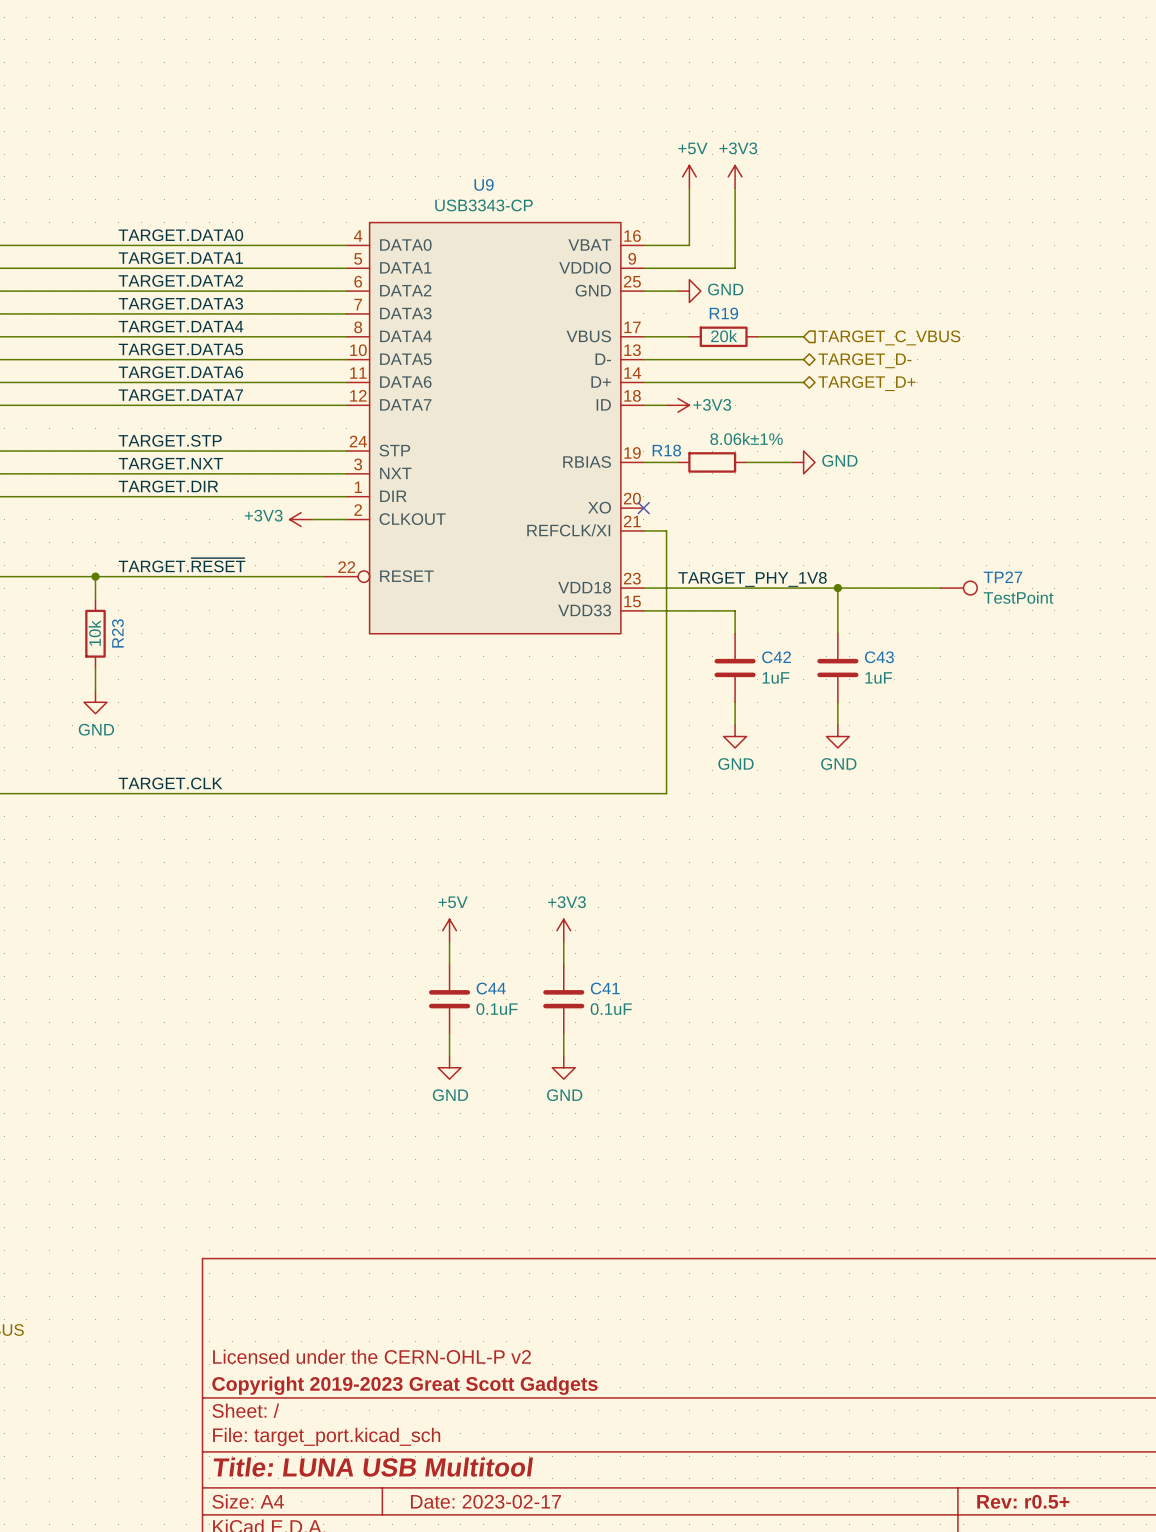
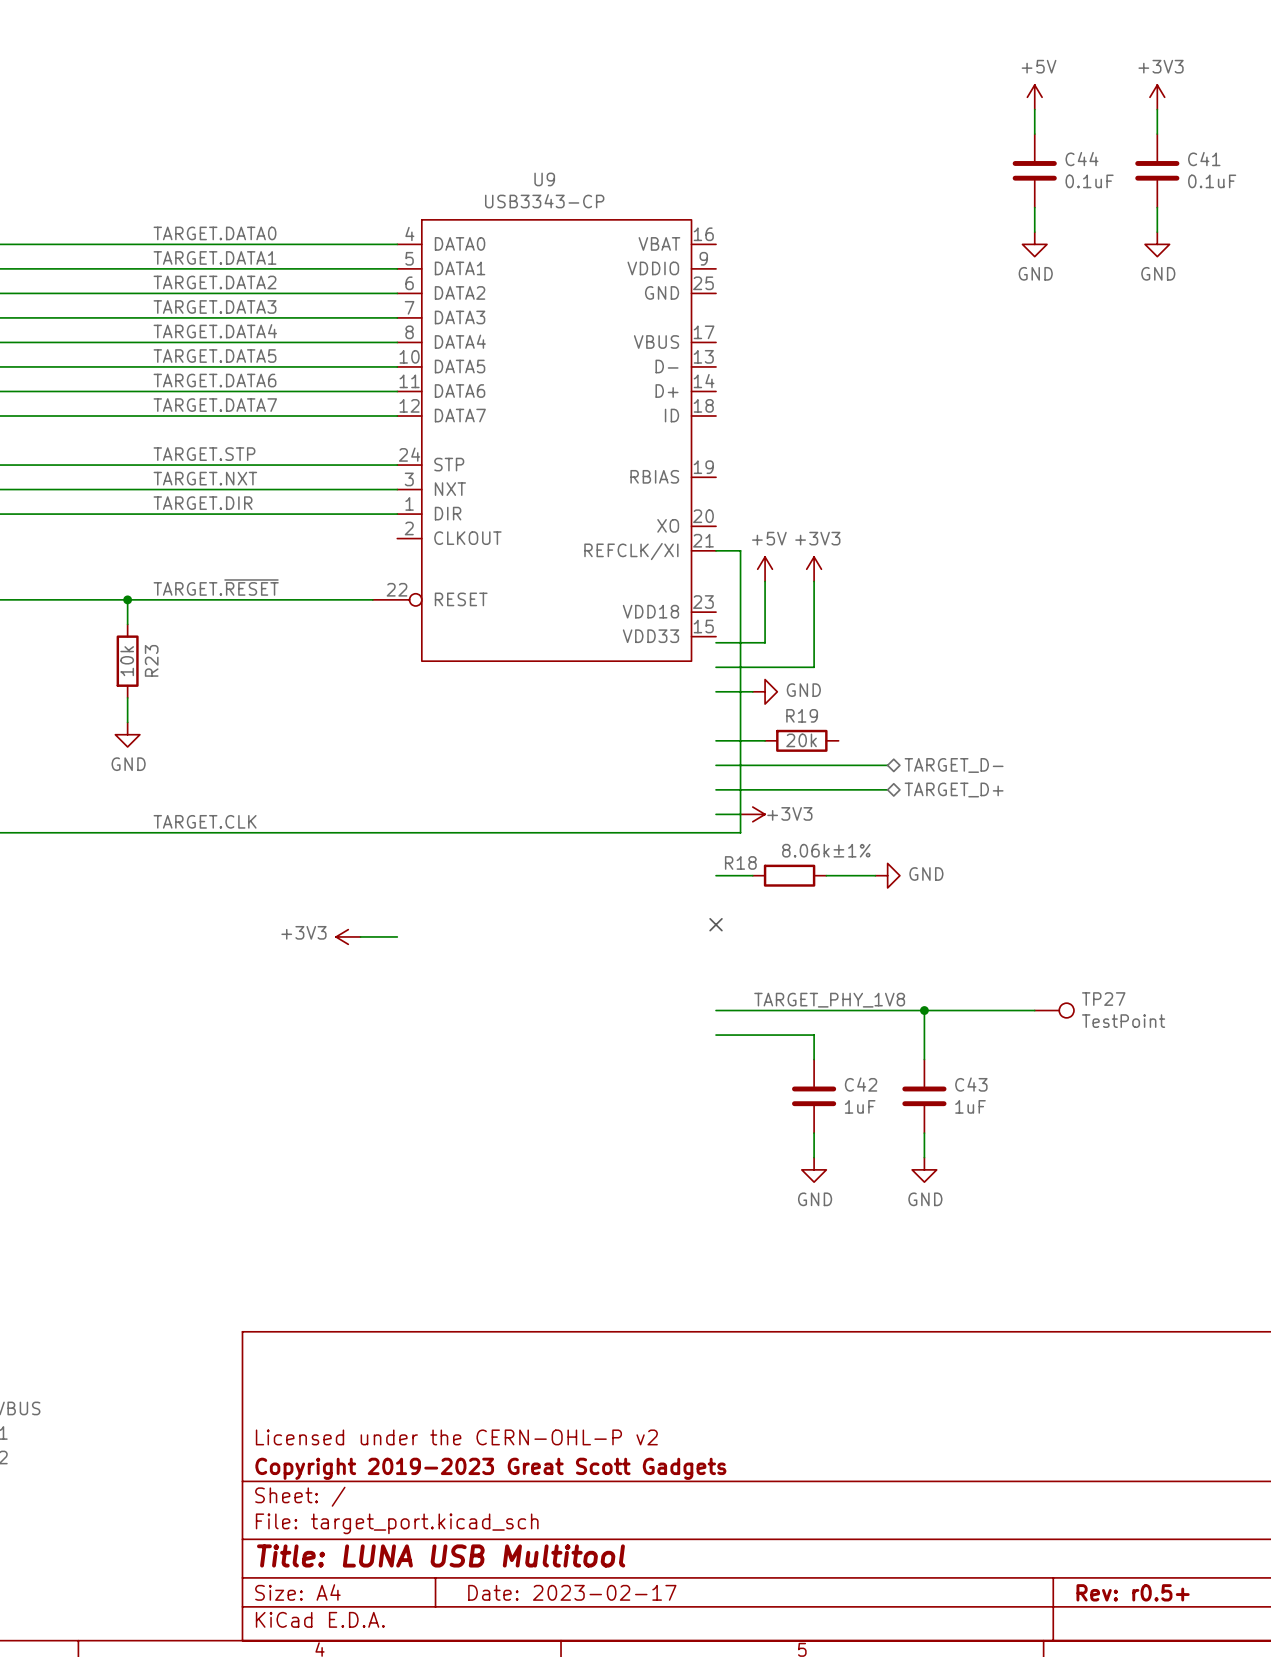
power symbol: none -> +5V (1034, 97)
power symbol: none -> +3V3 (1157, 97)
wire: none -> (1034, 109) (1034, 134)
wire: none -> (1157, 109) (1157, 134)
power symbol: +5V (689, 176) -> none
power symbol: +3V3 (735, 176) -> none
wire: (689, 188) (689, 245) (643, 245) -> none
wire: (735, 188) (735, 268) (643, 268) -> none
wire: none -> (1034, 207) (1034, 232)
wire: none -> (1157, 207) (1157, 232)
power symbol: none -> GND (1034, 244)
power symbol: none -> GND (1157, 244)
wire: (643, 291) (677, 291) -> none
power symbol: GND (689, 291) -> none
wire: (643, 336) (689, 336) -> none
R19 position: (723, 336) -> (801, 740)
wire: (757, 336) (803, 336) -> none
hierarchical label: TARGET_C_VBUS (889, 337) -> none
wire: (643, 359) (803, 359) -> none
hierarchical label: TARGET_D- (864, 360) -> none
wire: (643, 382) (803, 382) -> none
hierarchical label: TARGET_D+ (867, 383) -> none
wire: (643, 405) (666, 405) -> none
power symbol rotation: 0° (677, 405) -> 90° counterclockwise (814, 569)
power symbol position: +3V3 (677, 405) -> +3V3 (814, 569)
wire: (643, 462) (677, 462) -> (716, 691) (752, 691)
R18 position: (712, 462) -> (789, 875)
wire: (746, 462) (792, 462) -> none
power symbol: GND (803, 462) -> none
no-connect mark: (643, 508) -> none
power symbol: +3V3 (301, 519) -> none
wire: (312, 519) (346, 519) -> none
power symbol: none -> +5V (765, 569)
wire: none -> (765, 581) (765, 642) (716, 642)
label: TARGET_PHY_1V8 (752, 579) -> none
wire: (643, 588) (940, 588) -> none
wire: (837, 588) (837, 633) -> none
junction: (837, 588) -> none
TP27 position: (958, 588) -> (1054, 1010)
wire: (643, 610) (735, 610) -> (814, 581) (814, 636)
wire: none -> (814, 661) (814, 667) (716, 667)
power symbol: none -> GND (765, 691)
C42 position: (735, 668) -> (814, 1096)
C43 position: (837, 668) -> (924, 1096)
wire: (735, 702) (735, 725) -> none
wire: (837, 702) (837, 725) -> none
wire: none -> (716, 740) (765, 740)
wire: none -> (716, 765) (887, 765)
hierarchical label: none -> TARGET_D- (954, 765)
power symbol: GND (735, 736) -> none
power symbol: GND (837, 736) -> none
wire: none -> (716, 789) (887, 789)
hierarchical label: none -> TARGET_D+ (954, 790)
wire: none -> (716, 814) (740, 814)
power symbol: none -> +3V3 (752, 814)
wire: none -> (716, 875) (752, 875)
wire: none -> (826, 875) (875, 875)
power symbol: none -> GND (887, 875)
no-connect mark: none -> (716, 924)
power symbol: none -> +3V3 (348, 936)
wire: none -> (360, 936) (397, 936)
power symbol: +5V (449, 930) -> none
power symbol: +3V3 (563, 930) -> none
wire: (449, 942) (449, 964) -> none
wire: (563, 942) (563, 964) -> none
label: none -> TARGET_PHY_1V8 (829, 1000)
wire: none -> (716, 1010) (1034, 1010)
wire: none -> (924, 1010) (924, 1059)
junction: none -> (924, 1010)
wire: none -> (716, 1035) (814, 1035) (814, 1059)
C44 position: (449, 999) -> (1034, 170)
C41 position: (563, 999) -> (1157, 170)
wire: (449, 1033) (449, 1056) -> none
wire: (563, 1033) (563, 1056) -> (814, 1133) (814, 1157)
power symbol: GND (449, 1067) -> none
power symbol: GND (563, 1067) -> none
wire: none -> (924, 1133) (924, 1157)
power symbol: none -> GND (814, 1169)
power symbol: none -> GND (924, 1169)

